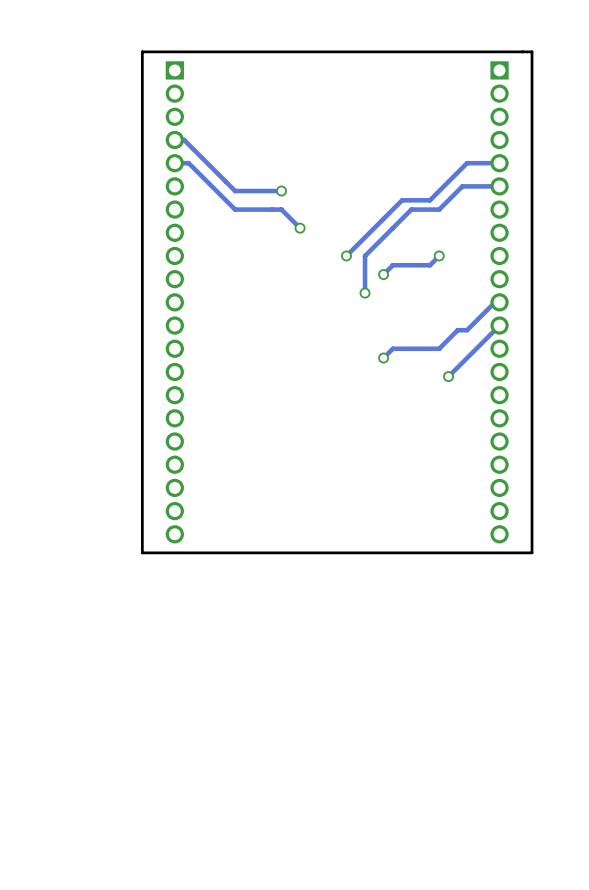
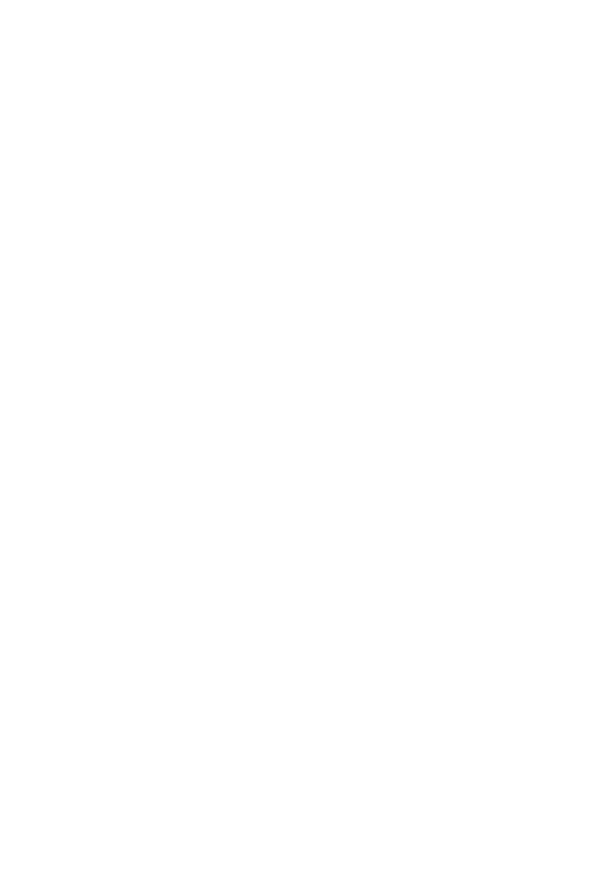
board edge: (532, 51) (142, 51) (142, 552) (532, 552) (532, 51) -> none
track: (174, 140) (184, 140) (235, 191) (281, 191) -> none
track: (174, 163) (188, 163) (235, 209) (281, 209) (300, 228) -> none
track: (499, 163) (467, 163) (429, 200) (402, 200) (346, 255) -> none
track: (499, 186) (462, 186) (439, 209) (411, 209) (365, 255) (365, 293) -> none
via: (281, 191) -> none
via: (300, 228) -> none
via: (346, 255) -> none
track: (439, 255) (429, 265) (392, 265) (383, 274) -> none
via: (439, 255) -> none
via: (383, 274) -> none
via: (365, 293) -> none
part: (174, 302) -> none
track: (499, 302) (494, 302) (467, 330) (457, 330) (439, 348) (392, 348) (383, 358) -> none
part: (499, 302) -> none
track: (499, 325) (448, 376) -> none
via: (383, 358) -> none
via: (448, 376) -> none

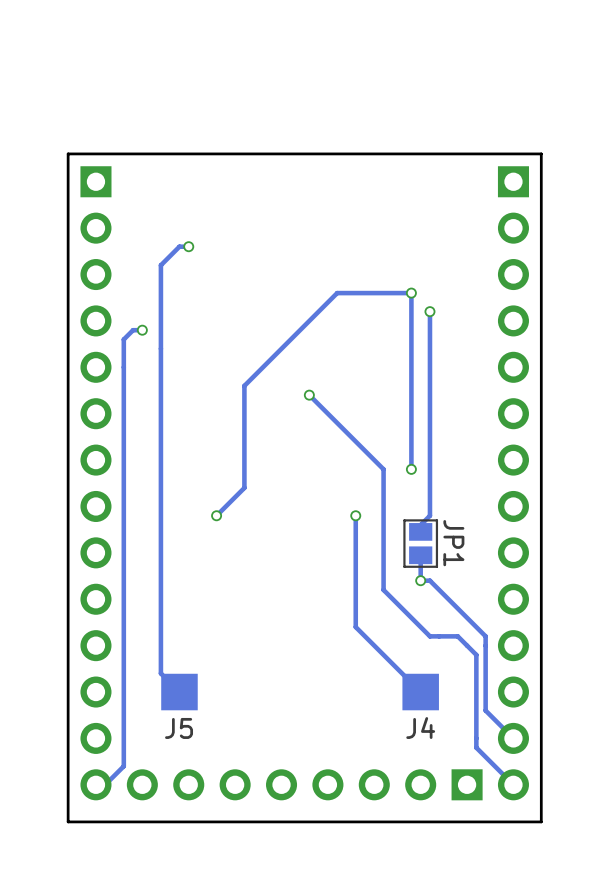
board edge: none -> (541, 153) (68, 153) (68, 821) (541, 821) (541, 153)
track: none -> (188, 246) (179, 246) (160, 265) (160, 673) (179, 692)
via: none -> (188, 246)
via: none -> (411, 293)
track: none -> (429, 311) (429, 515) (420, 525) (420, 531)
via: none -> (429, 311)
track: none -> (142, 330) (133, 330) (123, 339) (123, 766) (95, 794)
via: none -> (142, 330)
track: none -> (309, 395) (383, 469) (383, 589) (429, 636) (457, 636) (476, 654) (476, 747) (513, 784)
via: none -> (309, 395)
track: none -> (411, 469) (411, 293) (337, 293) (244, 385) (244, 487) (216, 515)
via: none -> (411, 469)
part: none -> (95, 483)
part: none -> (513, 483)
via: none -> (216, 515)
track: none -> (355, 515) (355, 627) (420, 692)
via: none -> (355, 515)
JP1: none -> (420, 543)
track: none -> (420, 555) (420, 580) (429, 580) (485, 636) (485, 710) (513, 738)
via: none -> (420, 580)
J5: none -> (179, 692)
J4: none -> (420, 692)
part: none -> (304, 784)

